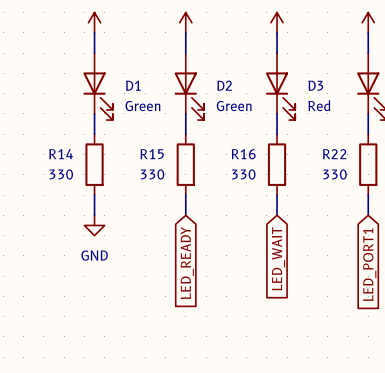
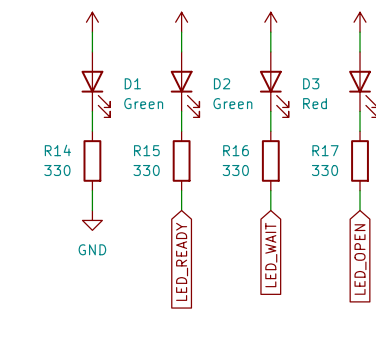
R22 name: R22 (334, 154) -> R17 (325, 150)
global label: LED_PORT1 (369, 264) -> LED_OPEN (360, 259)

